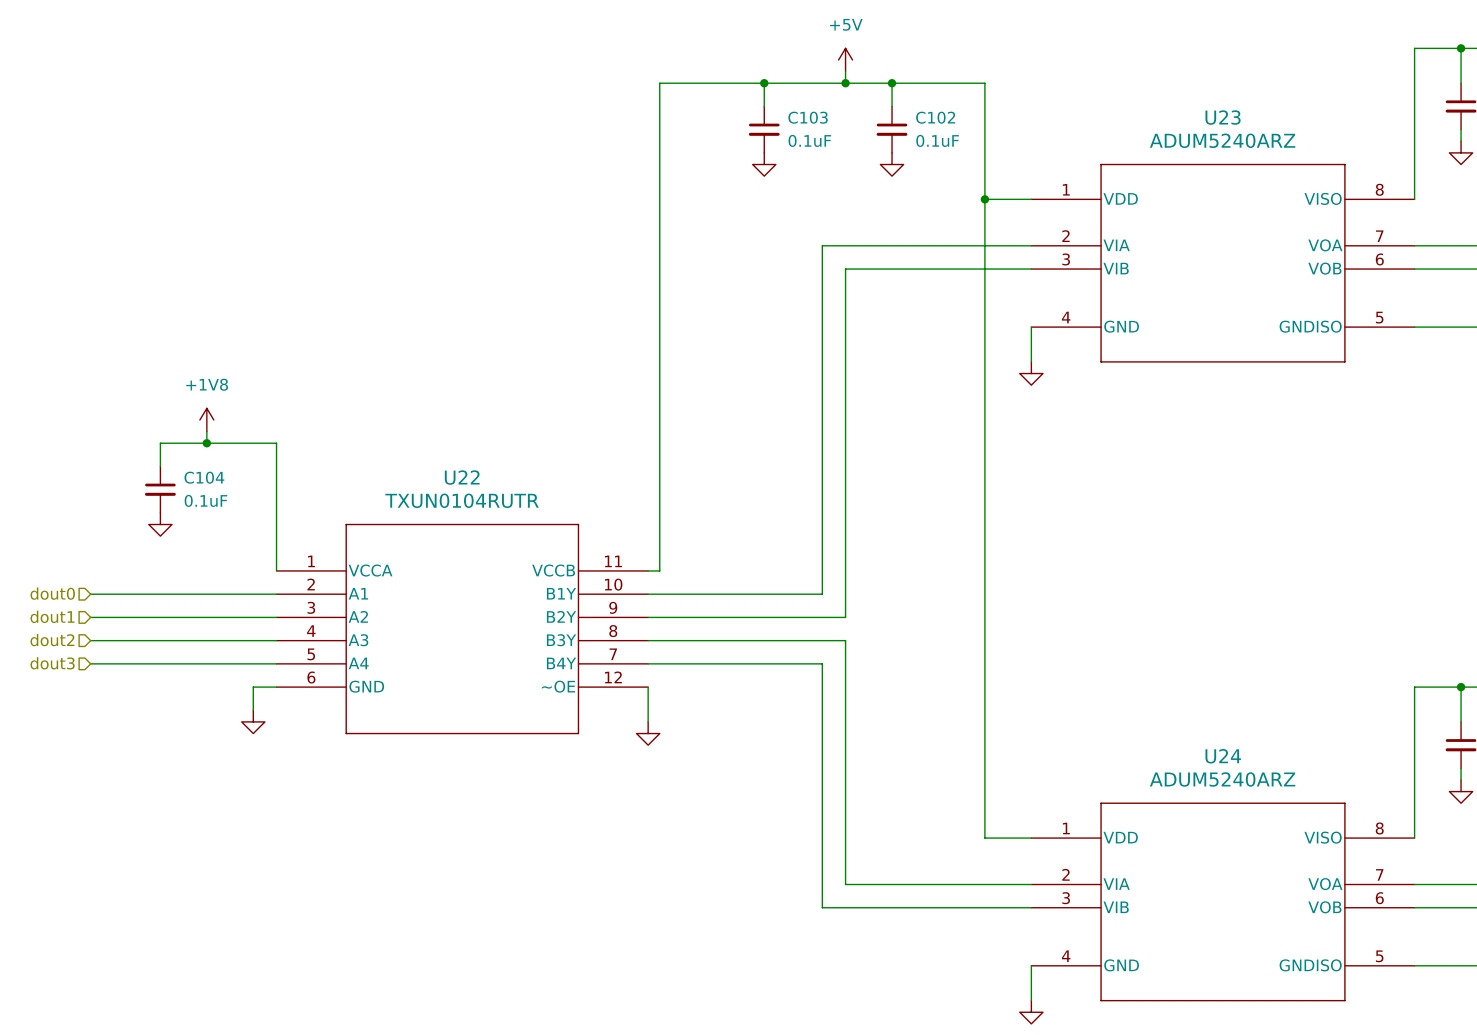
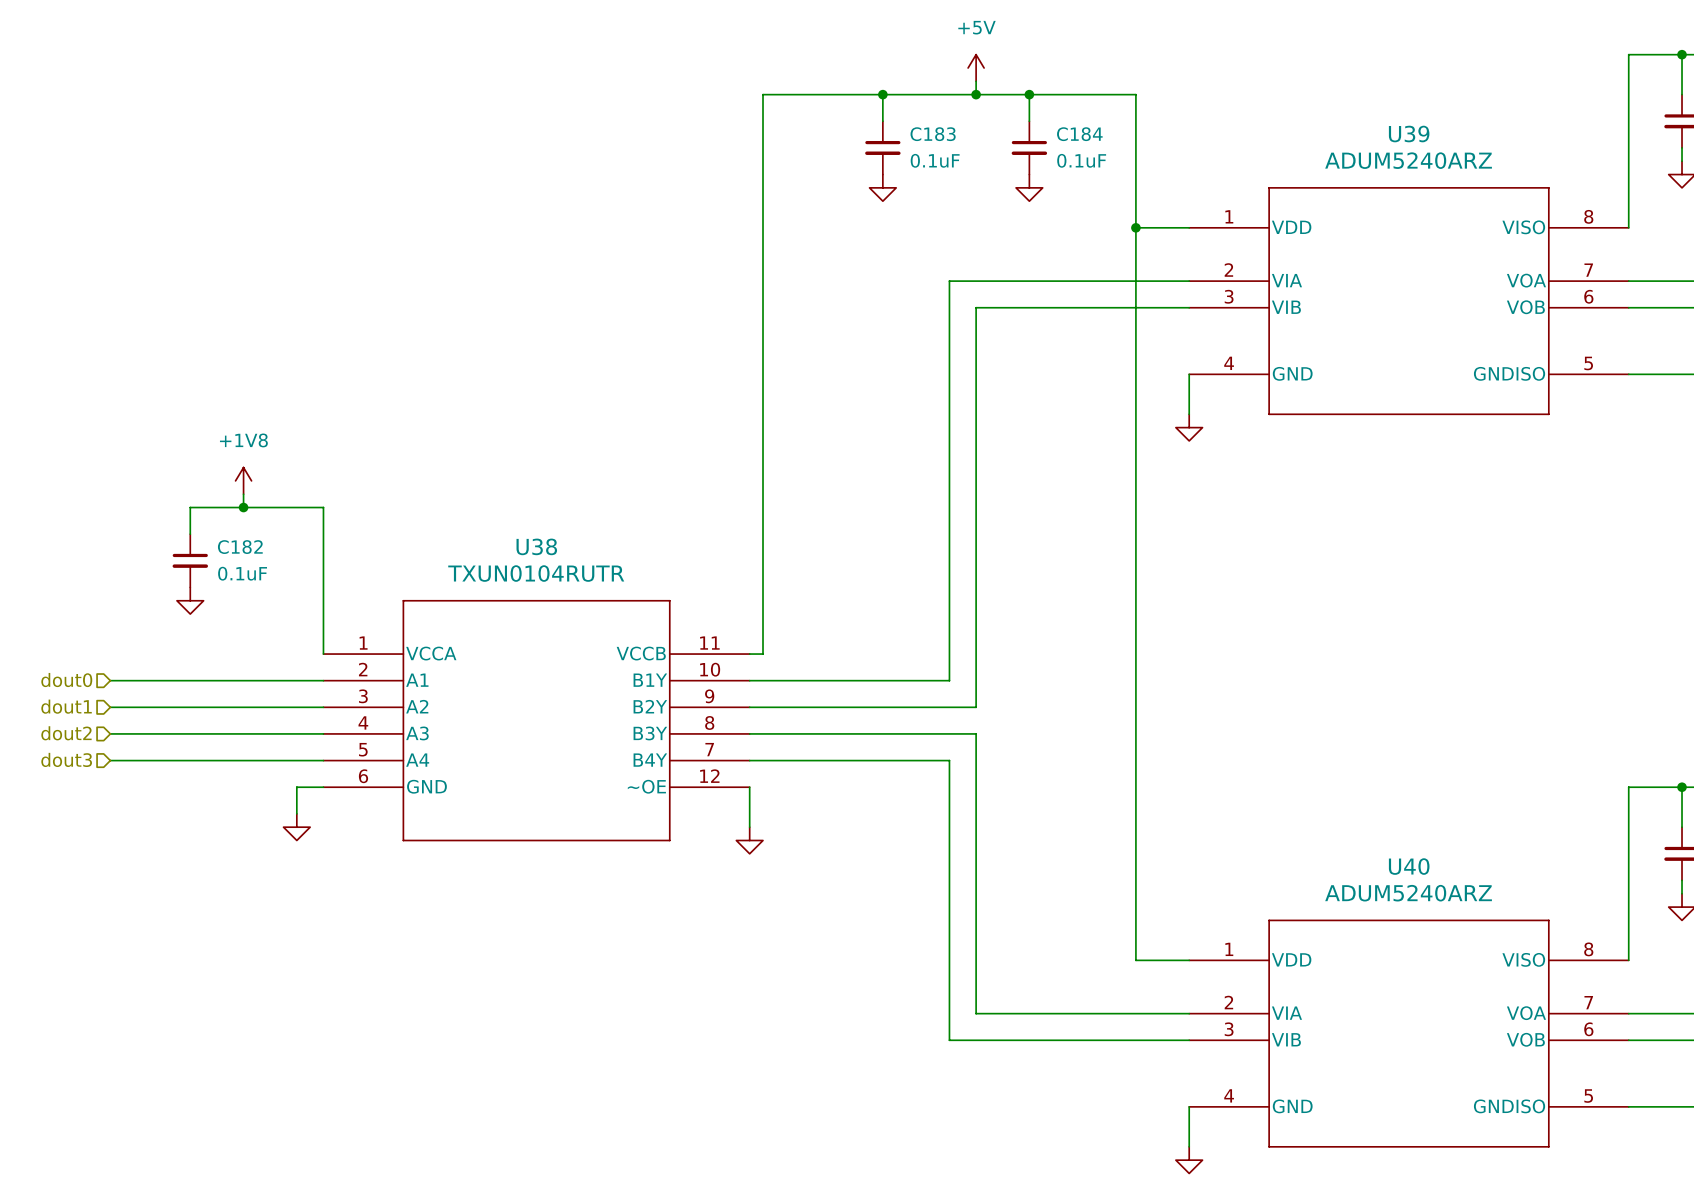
C103 name: C103 (808, 117) -> C183 (933, 134)
C102 name: C102 (935, 117) -> C184 (1079, 134)
U23 name: U23 (1223, 117) -> U39 (1409, 134)
C104 name: C104 (204, 477) -> C182 (240, 547)
U22 name: U22 (462, 477) -> U38 (536, 546)
U24 name: U24 (1223, 756) -> U40 (1409, 866)

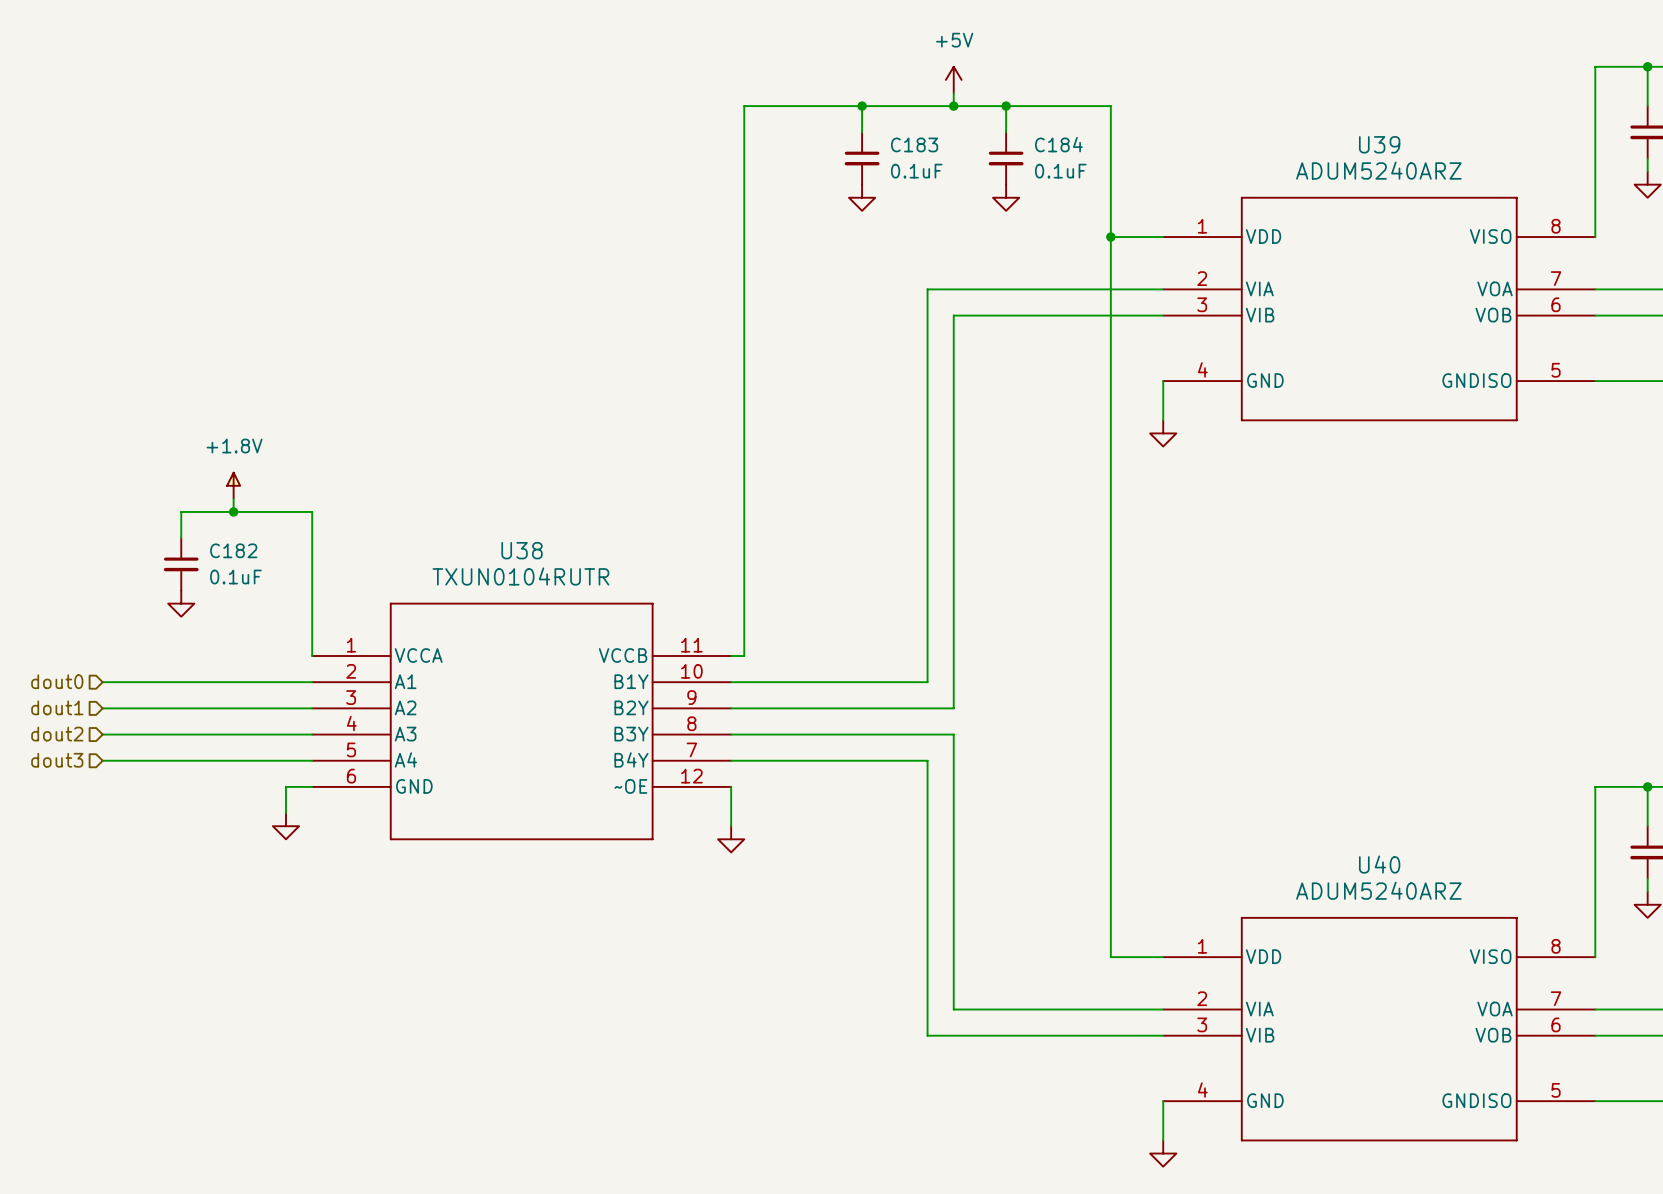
power symbol: +1V8 (243, 480) -> +1.8V (233, 485)

